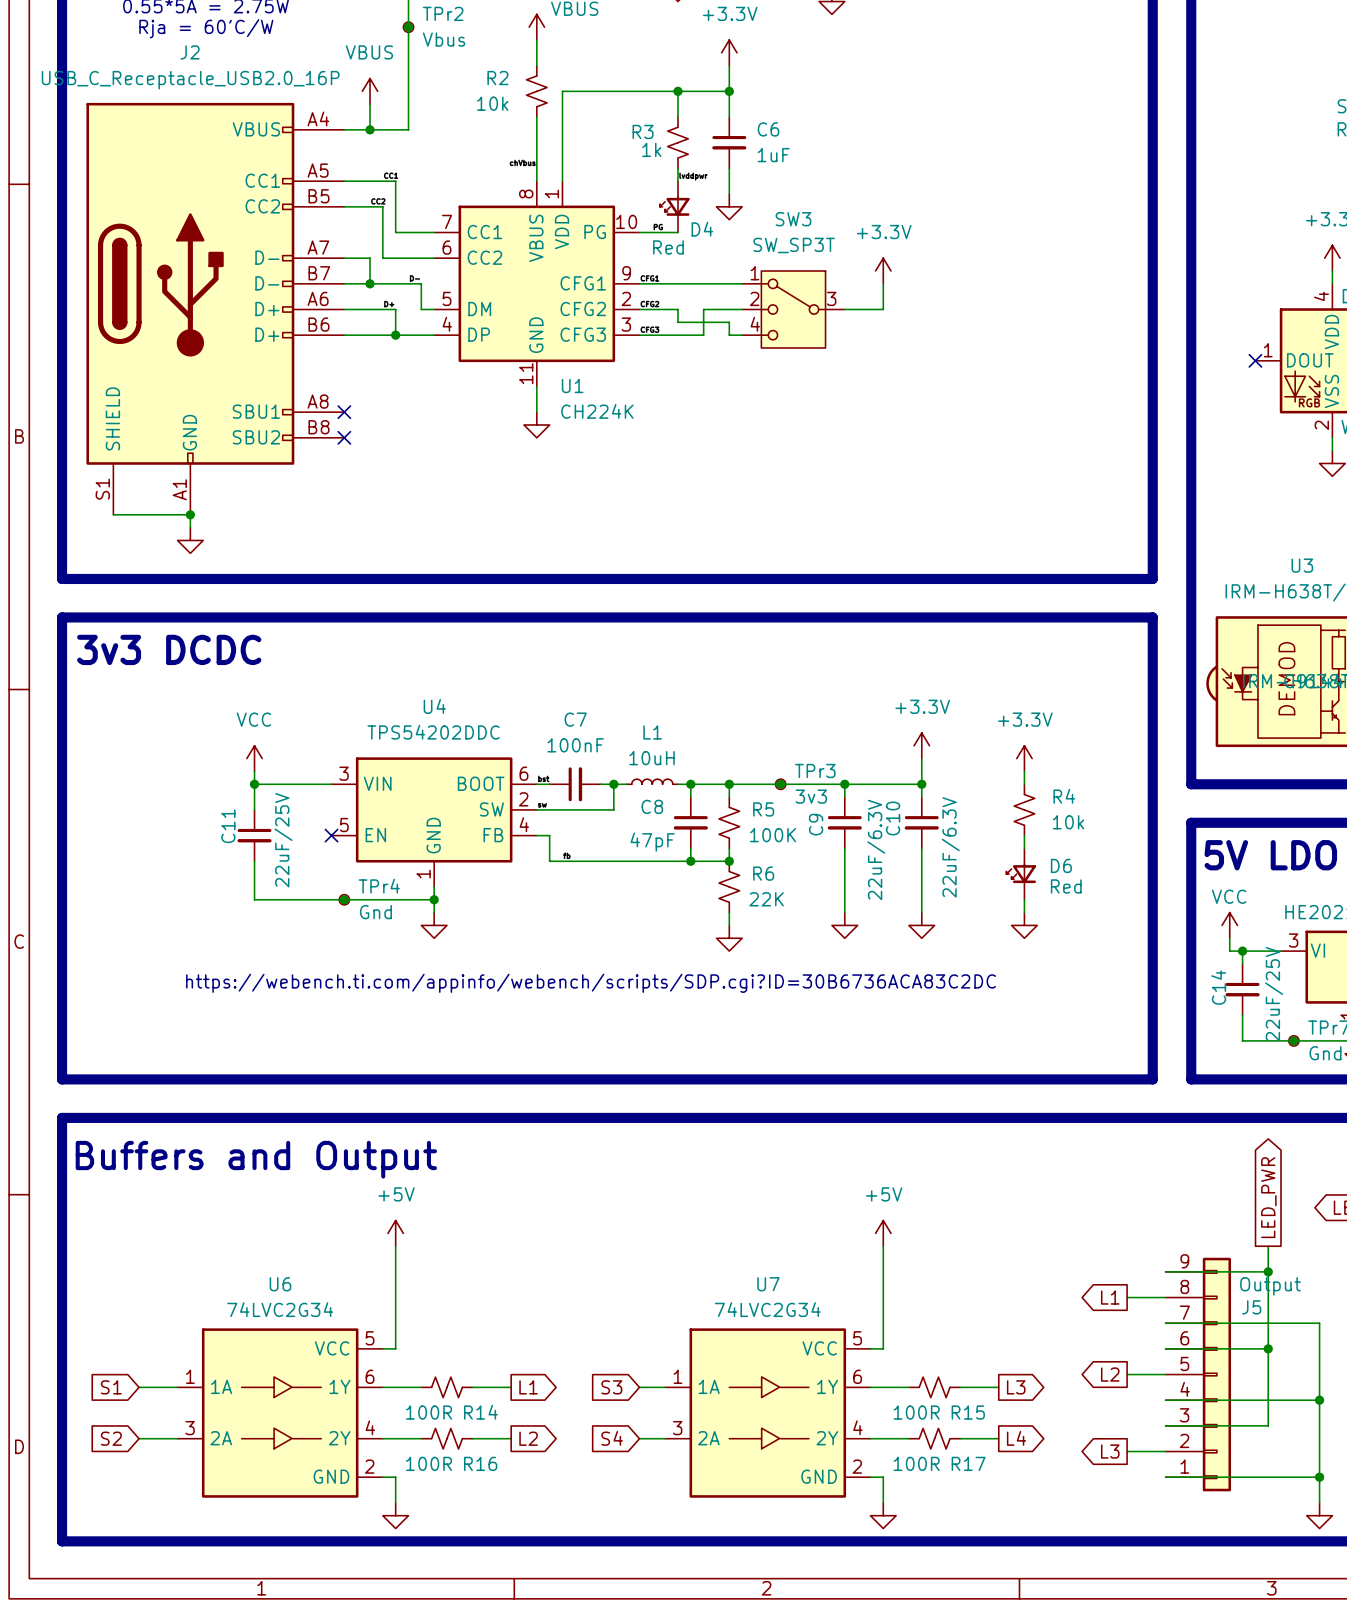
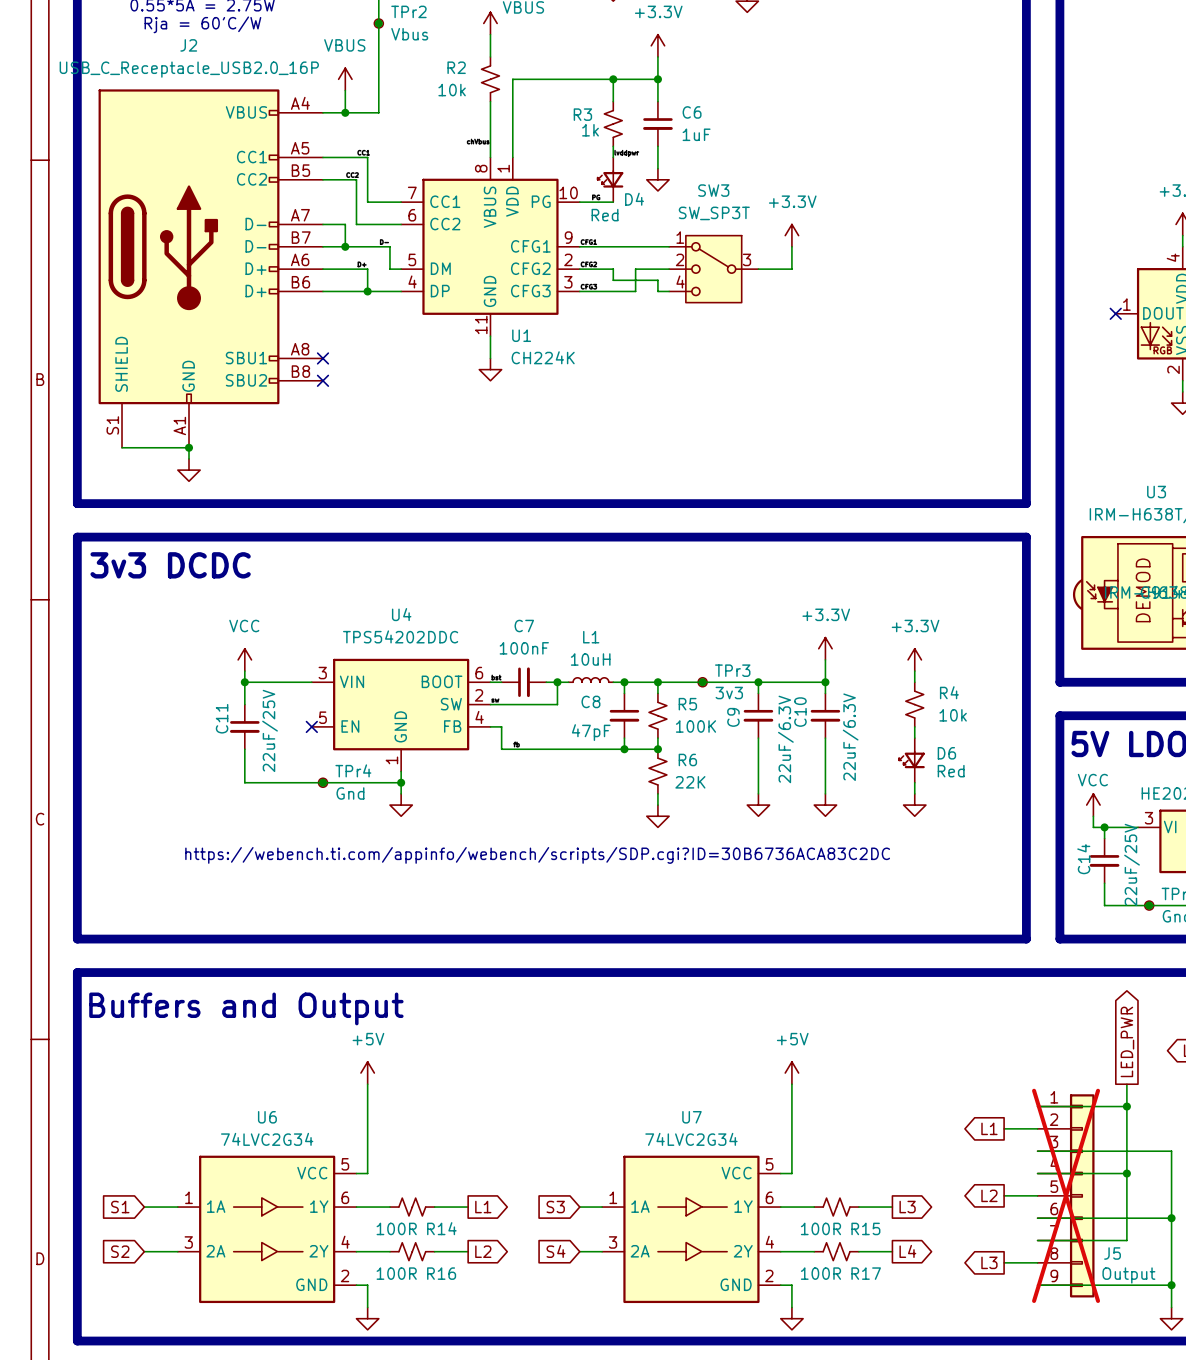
J5 do-not-place cross: none -> (1066, 1195)
J5 flip: as is (1216, 1374) -> up-down (1082, 1195)

